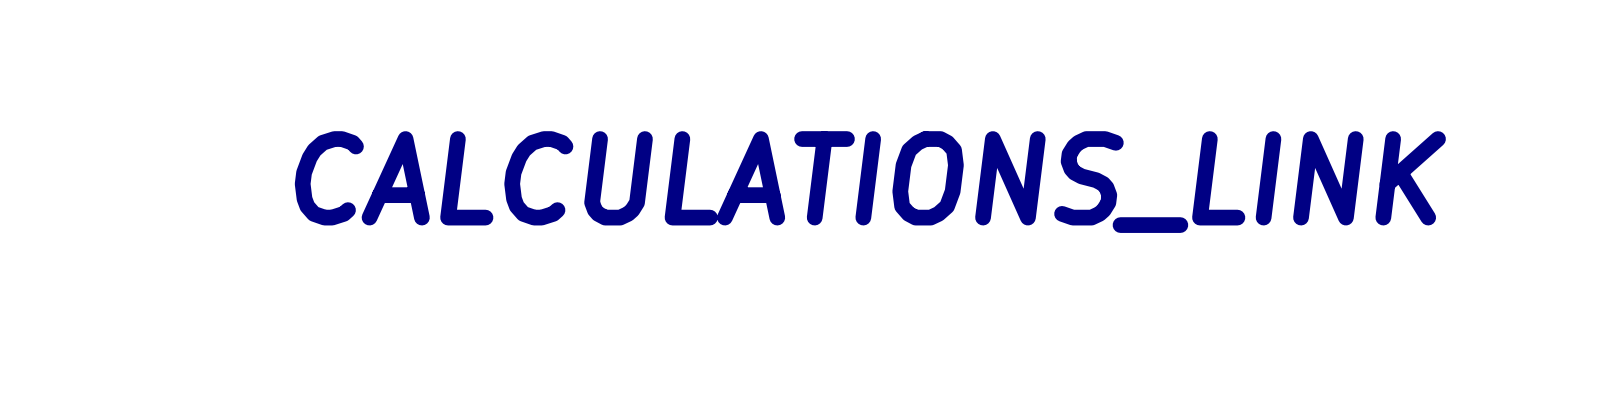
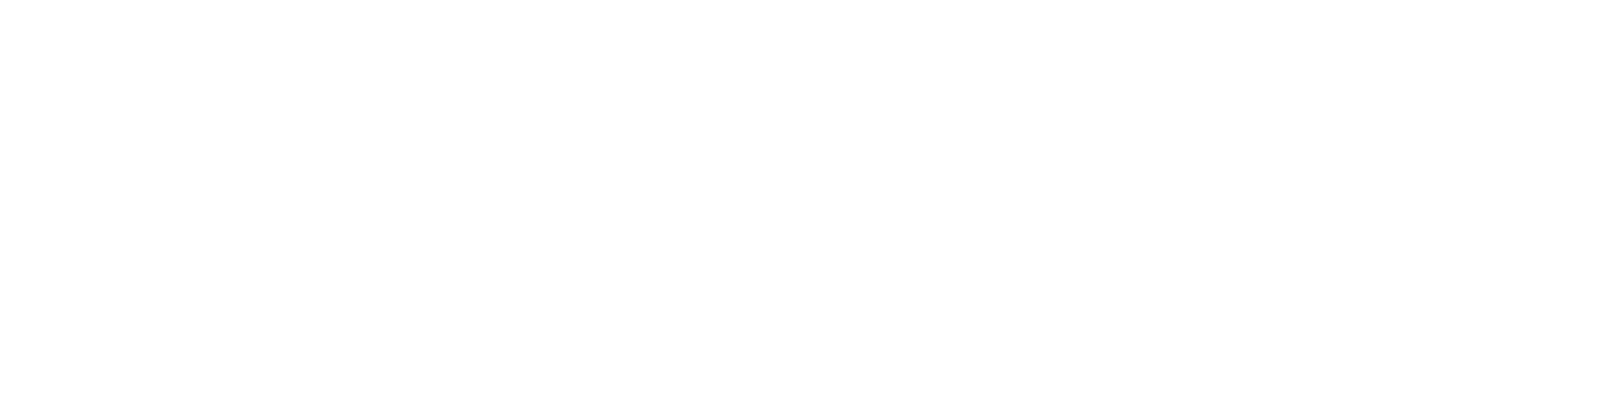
text: CALCULATIONS_LINK (870, 182) -> none

